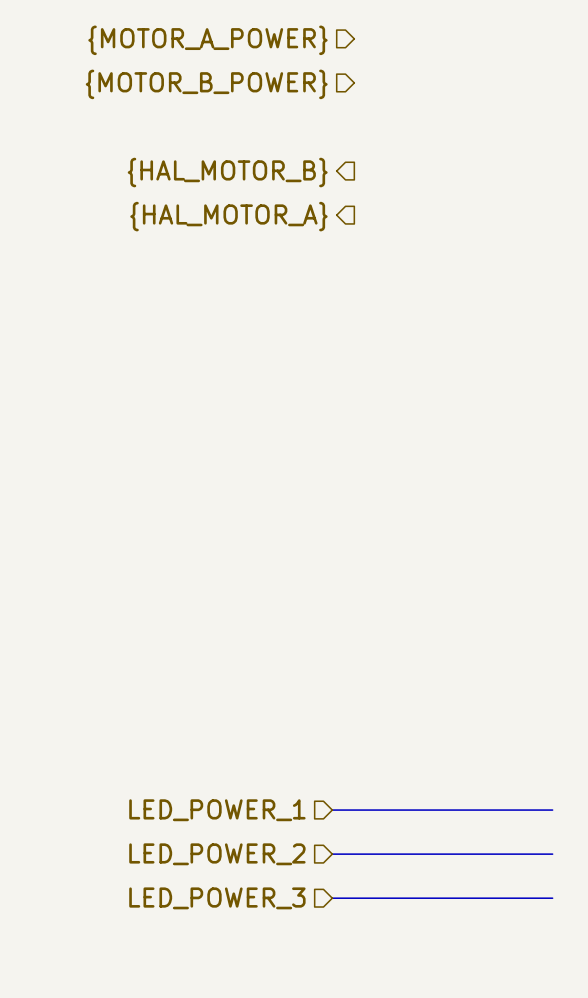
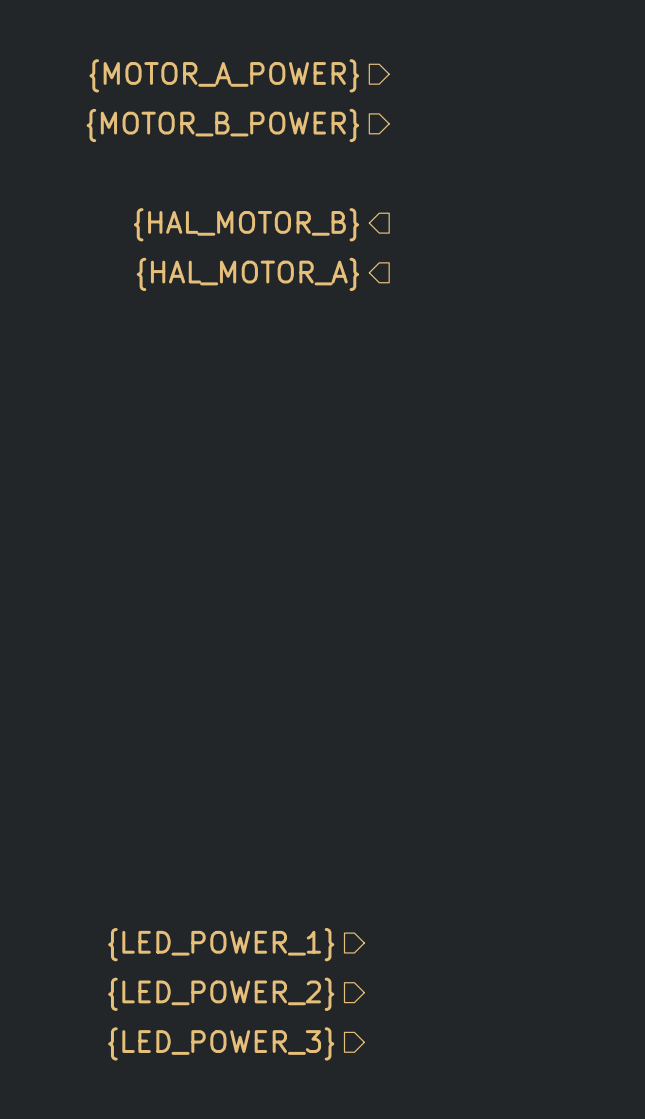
hierarchical label: LED_POWER_1 (217, 810) -> {LED_POWER_1} (221, 944)
bus: (332, 810) (552, 810) -> none
hierarchical label: LED_POWER_2 (217, 854) -> {LED_POWER_2} (221, 994)
bus: (332, 854) (552, 854) -> none
hierarchical label: LED_POWER_3 (217, 898) -> {LED_POWER_3} (221, 1043)
bus: (332, 898) (552, 898) -> none

